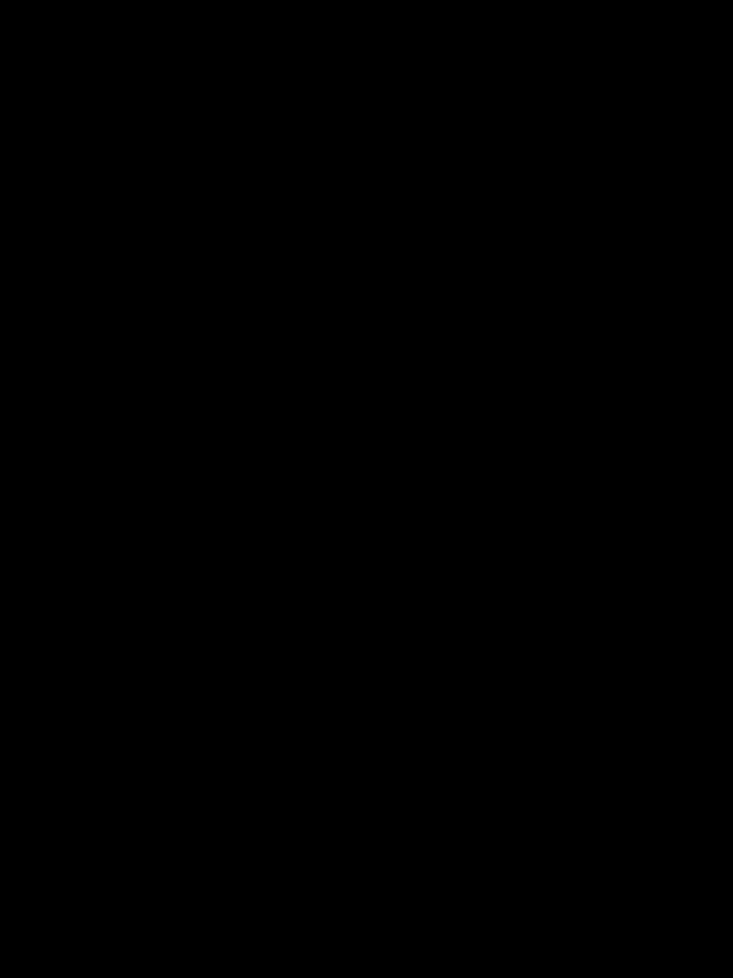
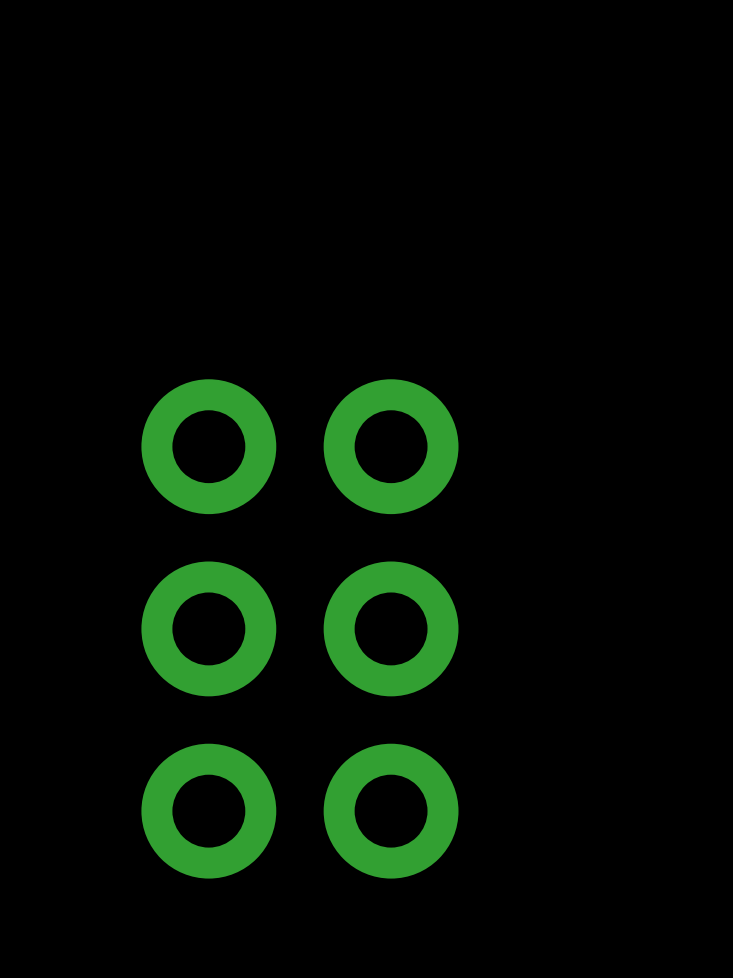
part: none -> (299, 628)

